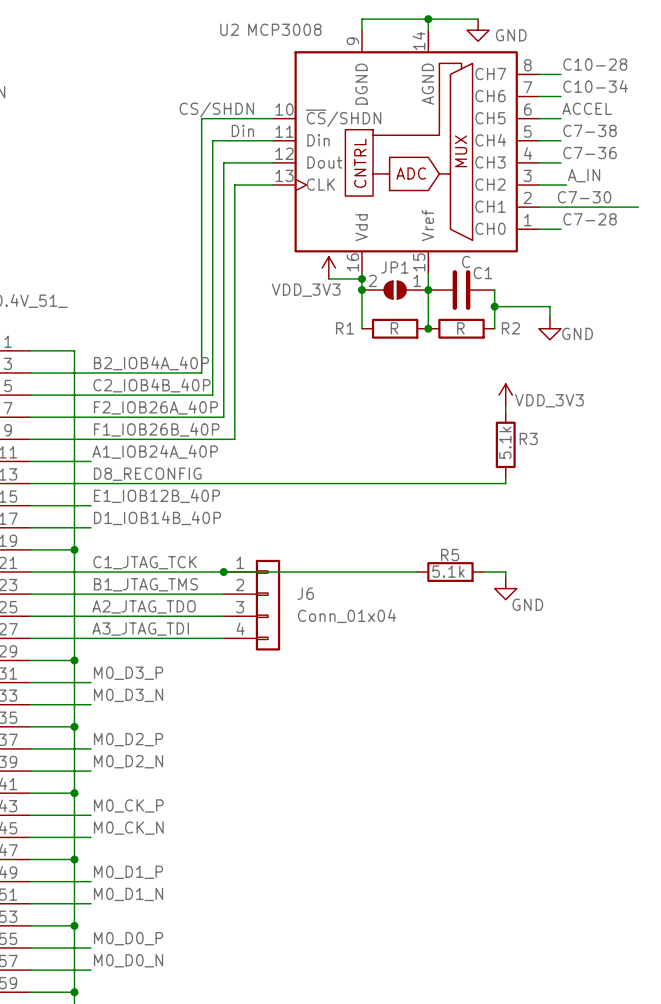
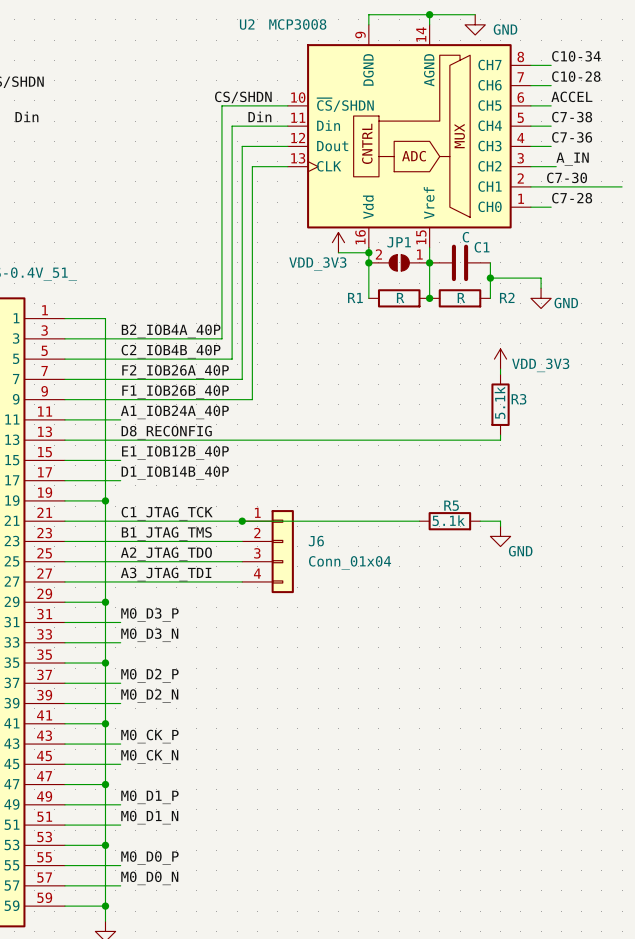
label: C10-28 (595, 64) -> C10-34 (576, 56)
label: C10-34 (595, 86) -> C10-28 (576, 76)

